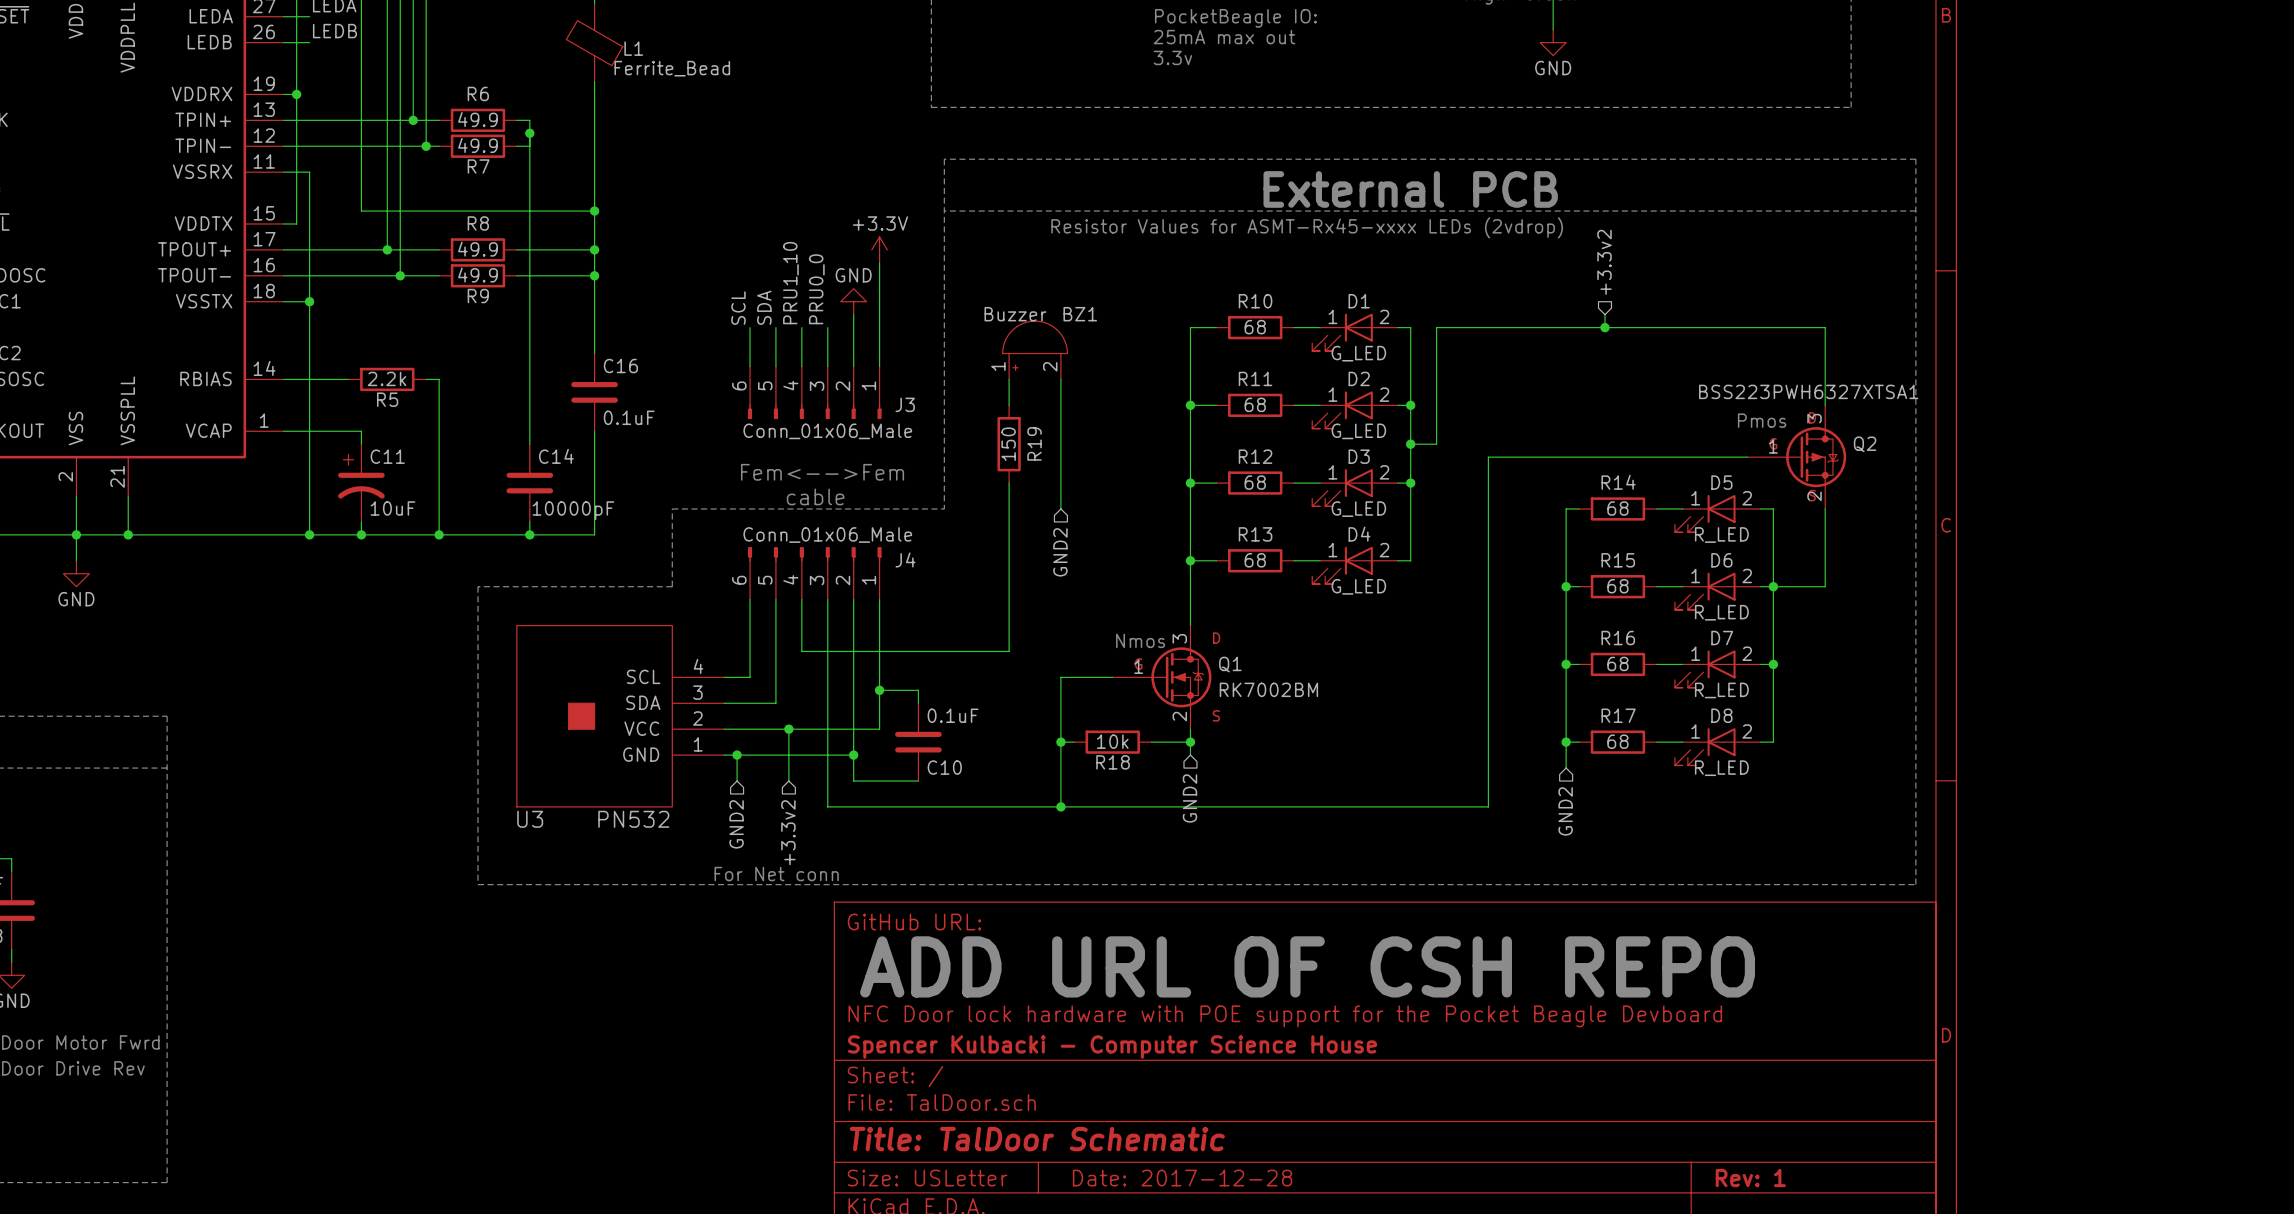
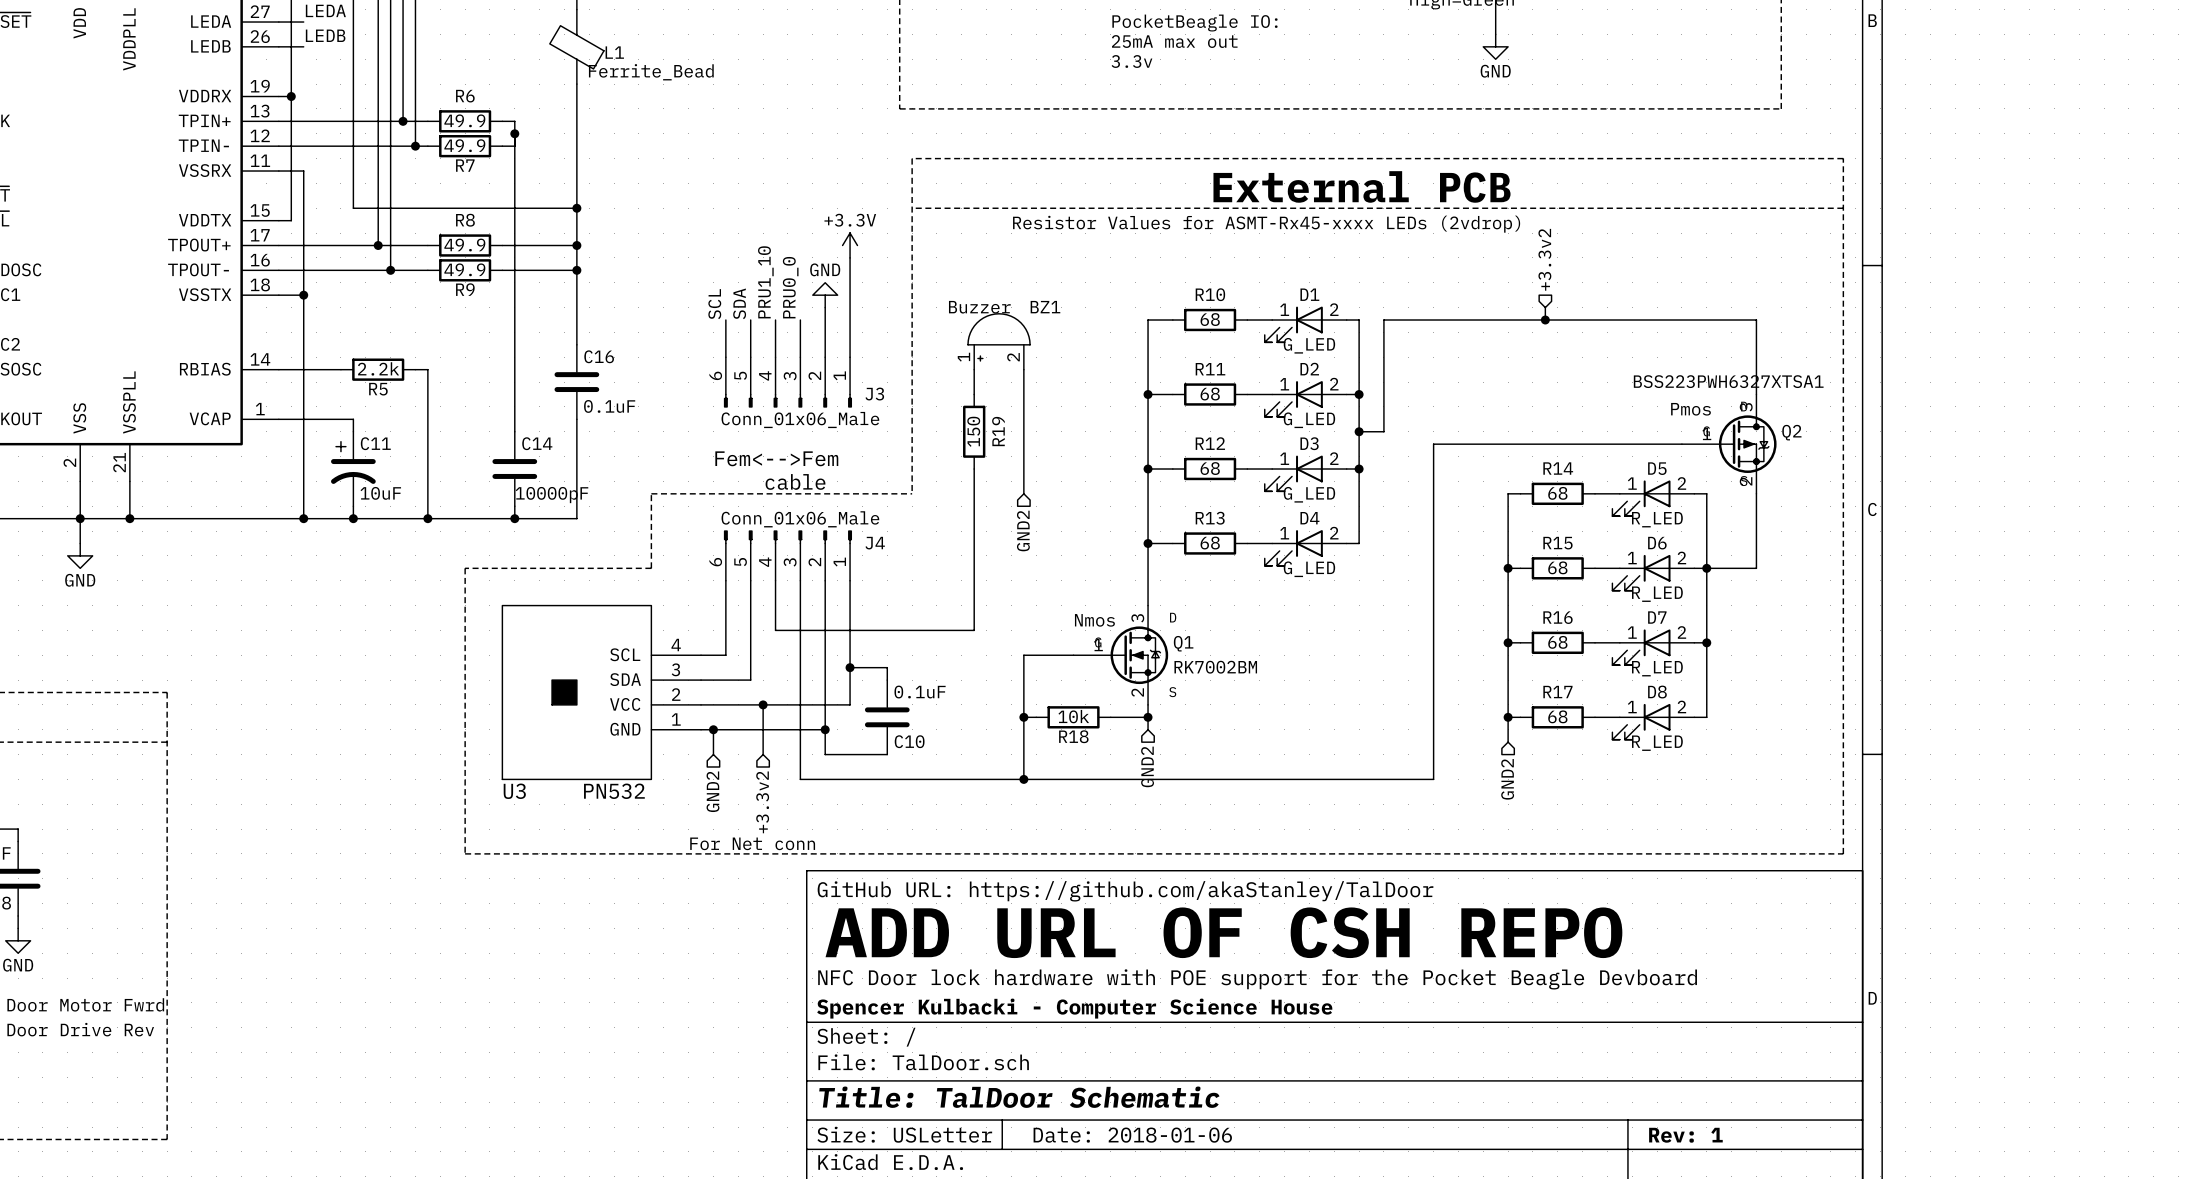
title block: GitHub URL: (914, 922) -> GitHub URL: https://github.com/akaStanley/TalDoor (1125, 891)
title block: Date: 2017-12-28 (1182, 1178) -> Date: 2018-01-06 (1132, 1135)

